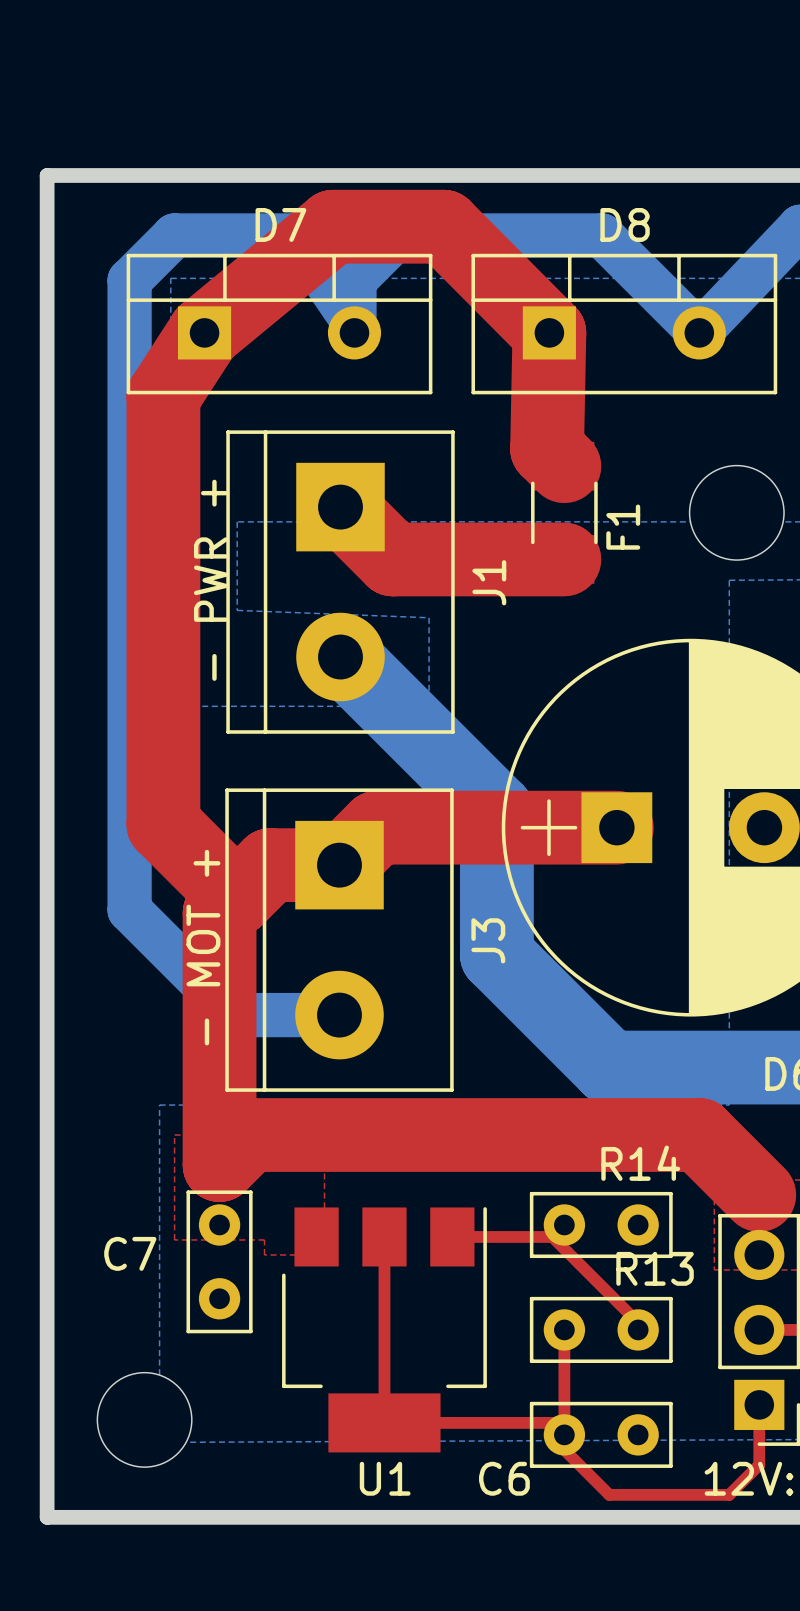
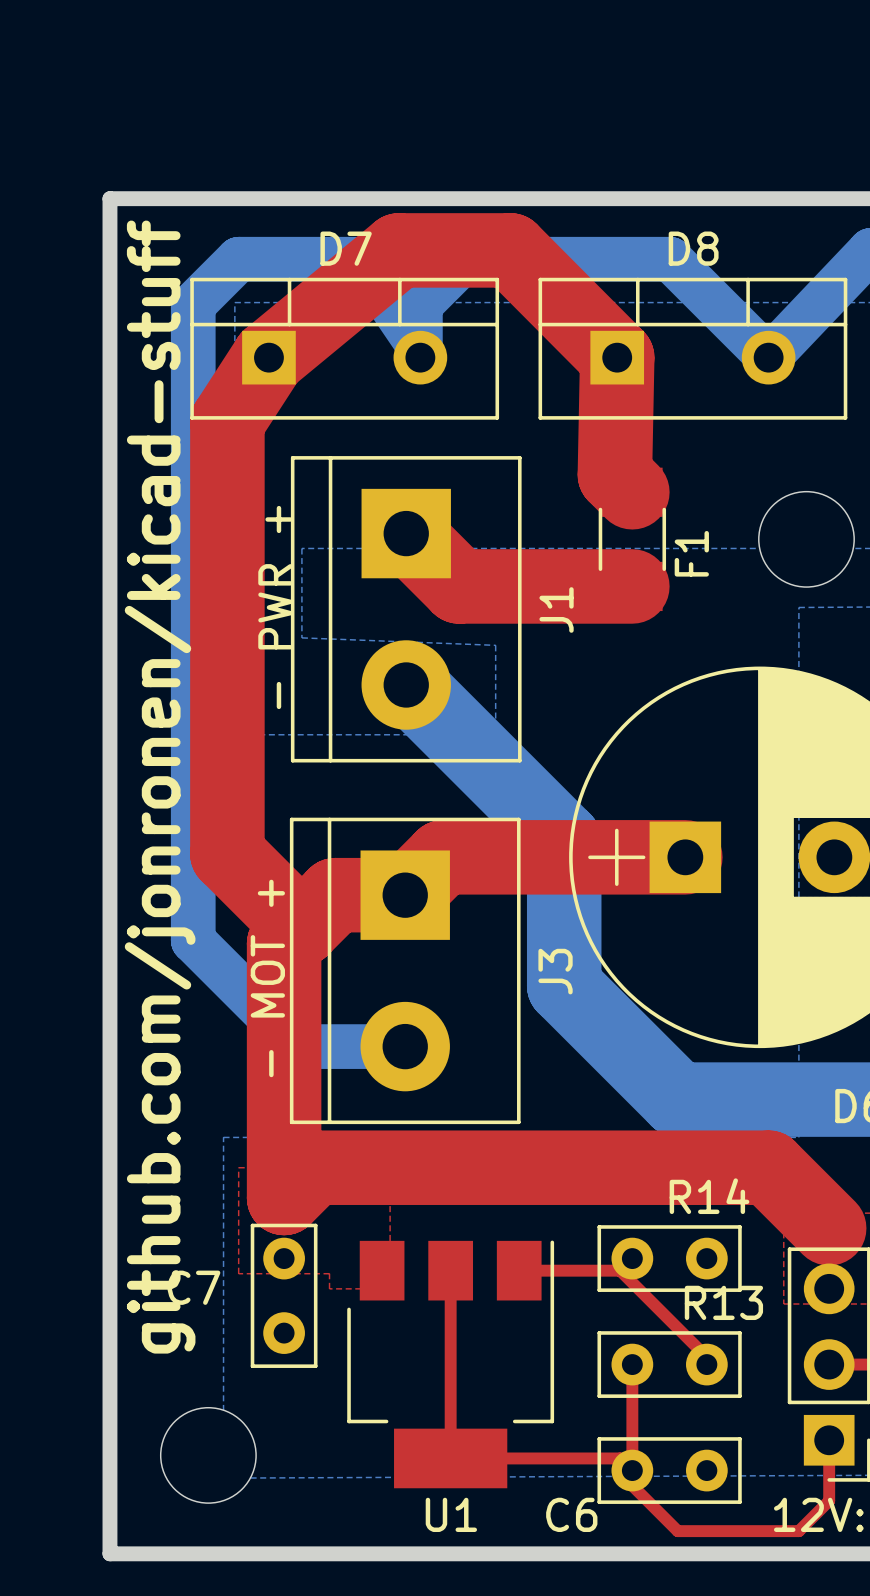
text: none -> github.com/jonronen/kicad-stuff (160, 787)

